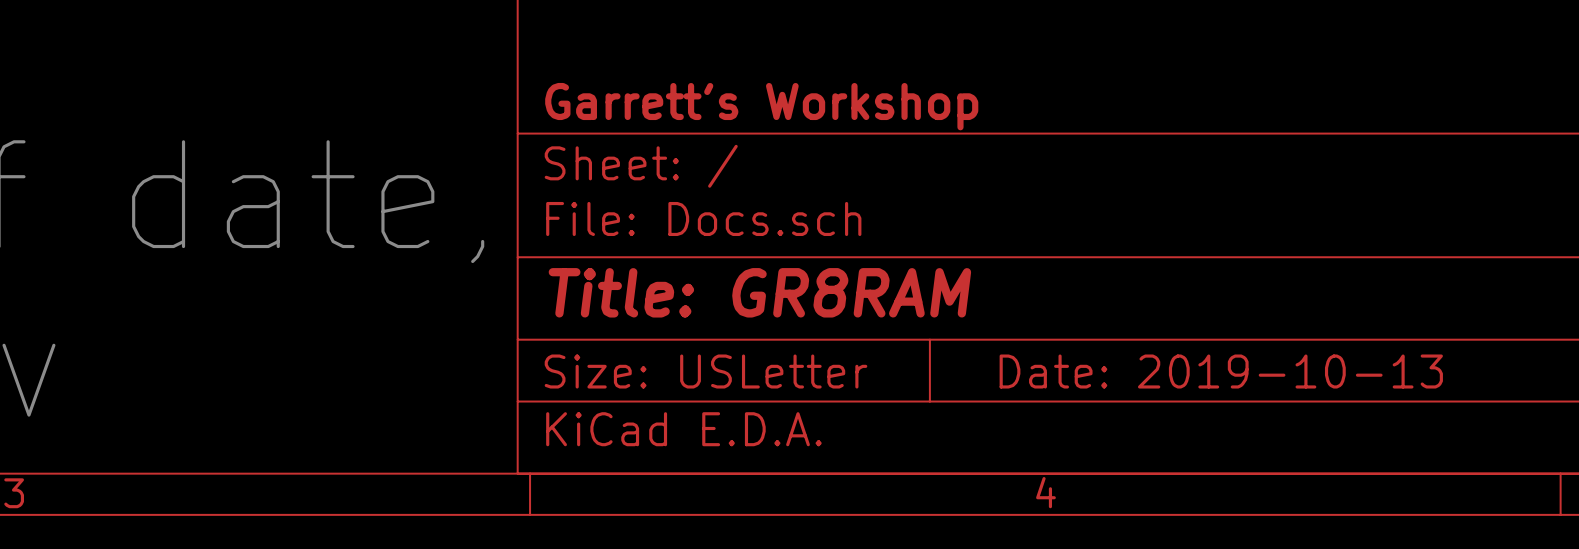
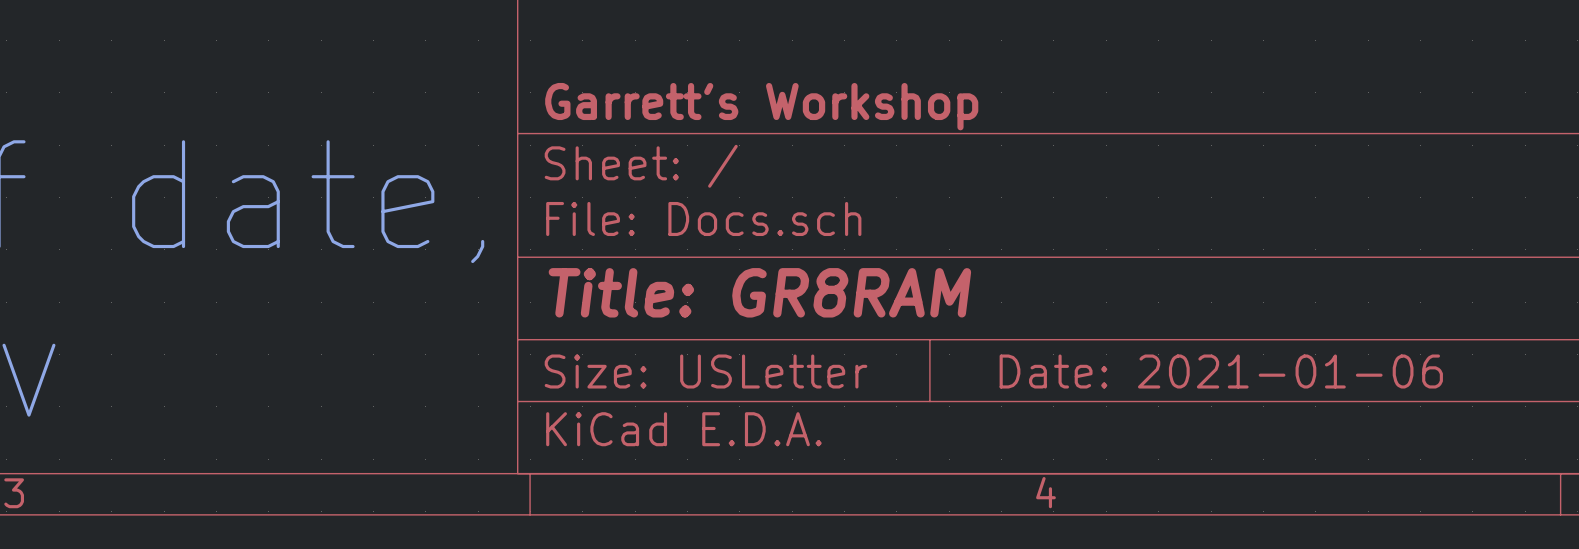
title block: Date: 2019-10-13 (1221, 371) -> Date: 2021-01-06 (1221, 371)

